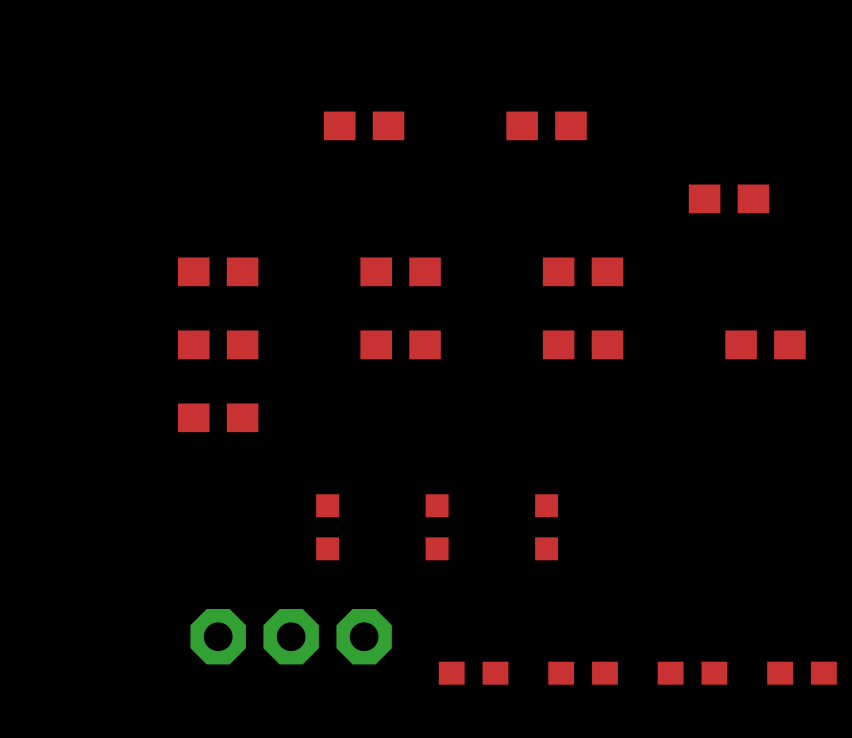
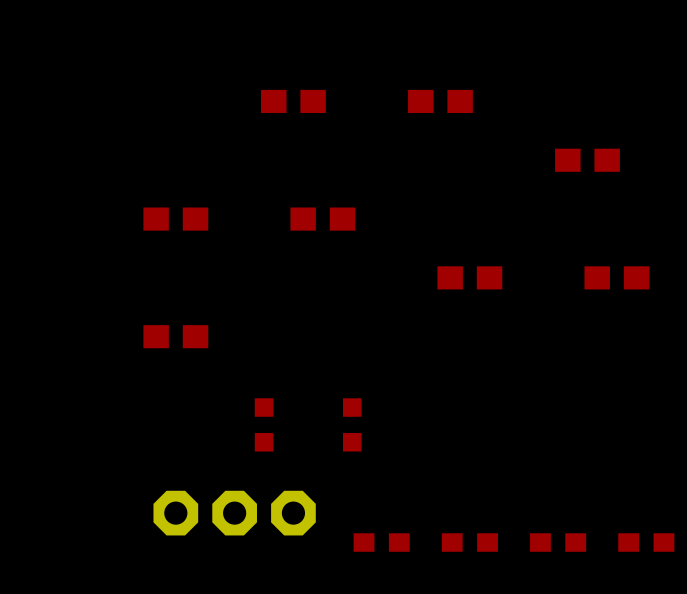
part: (583, 271) -> none
part: (218, 344) -> none
part: (400, 344) -> none
part: (546, 527) -> none

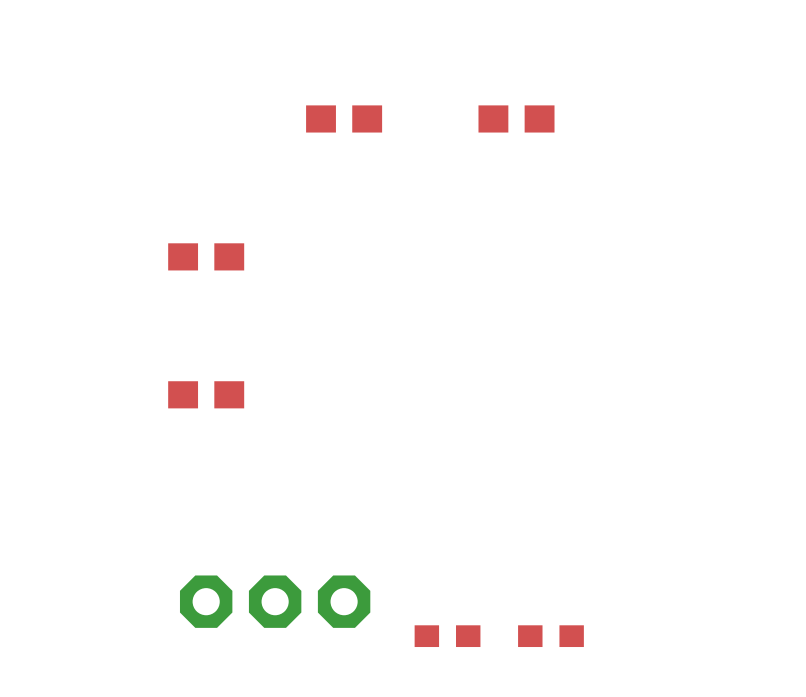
part: (587, 160) -> none
part: (322, 219) -> none
part: (469, 277) -> none
part: (616, 277) -> none
part: (264, 424) -> none
part: (352, 424) -> none
part: (558, 542) -> none
part: (646, 542) -> none

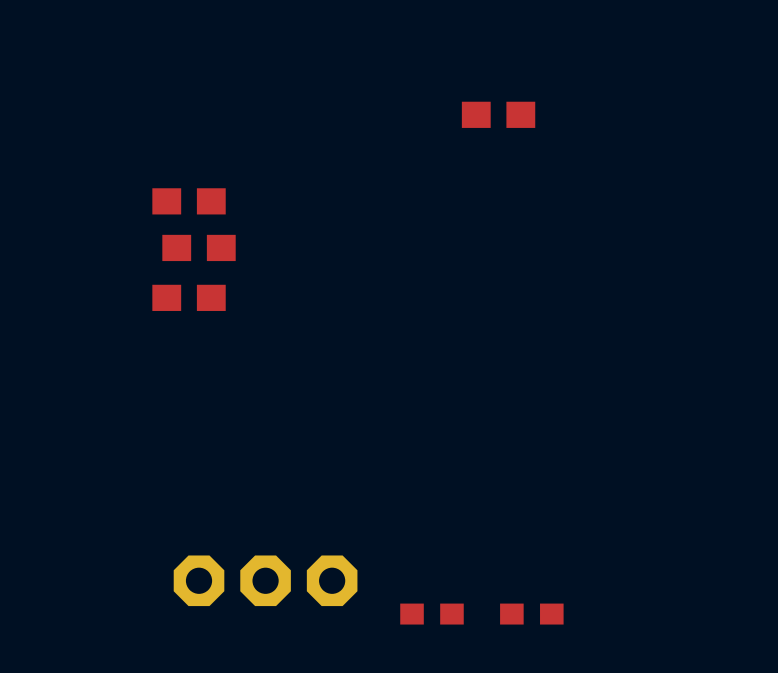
part: (344, 118) -> none
part: none -> (189, 201)
part position: (206, 394) -> (189, 297)

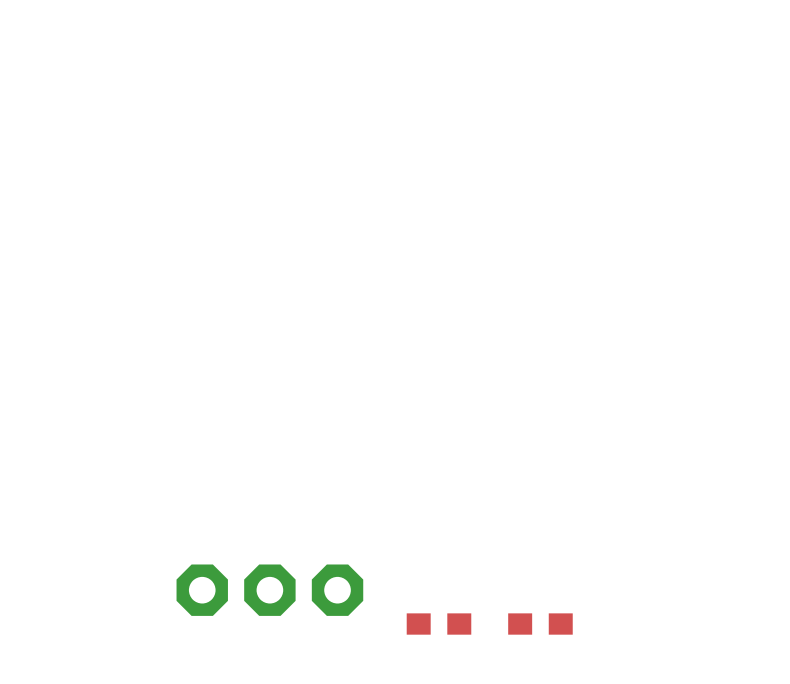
part: (498, 114) -> none
part: (189, 201) -> none
part: (199, 247) -> none
part: (189, 297) -> none

